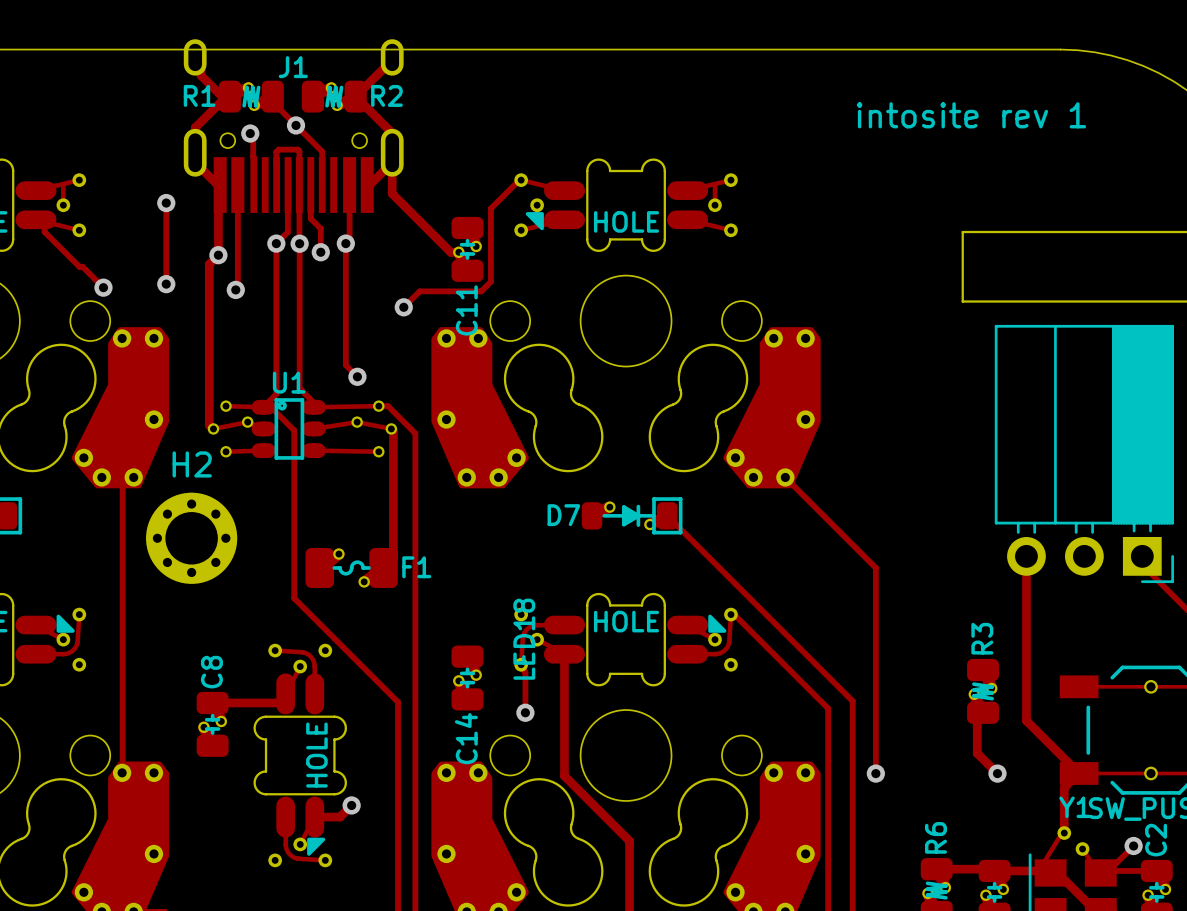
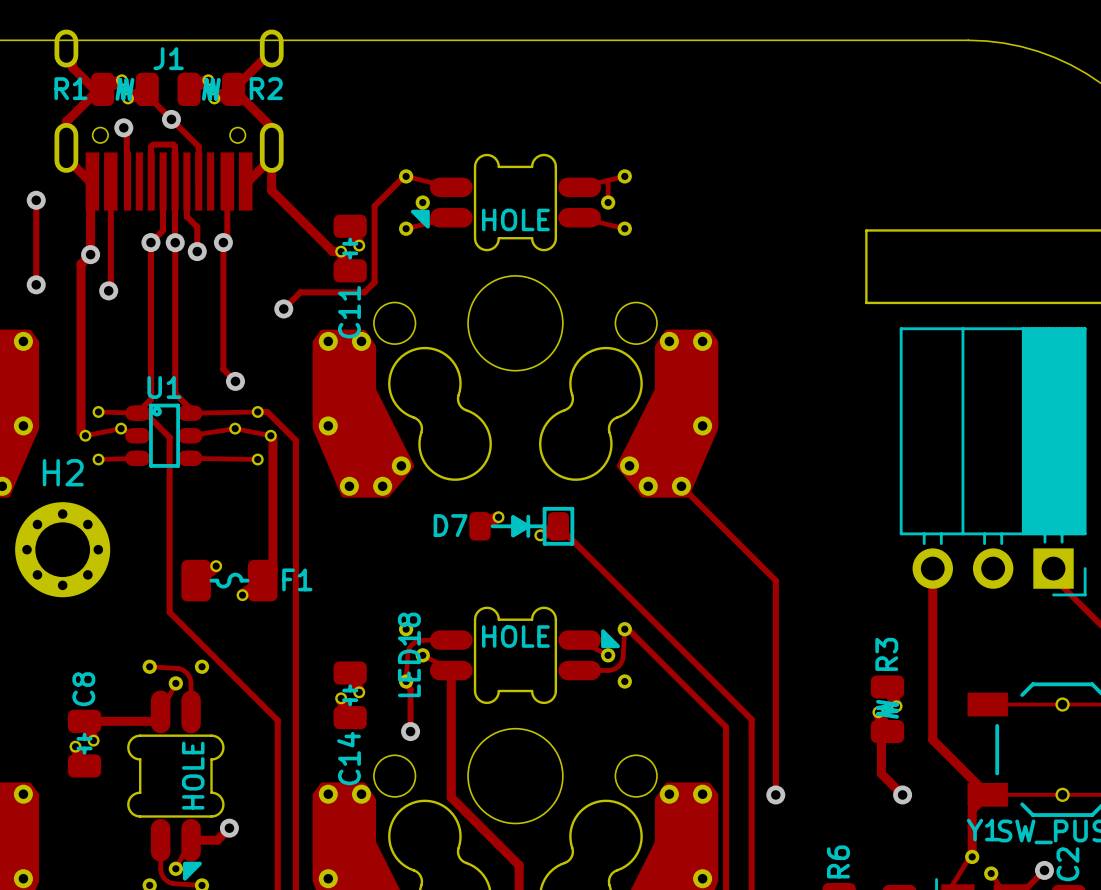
text: intosite rev 1 (971, 115) -> none

